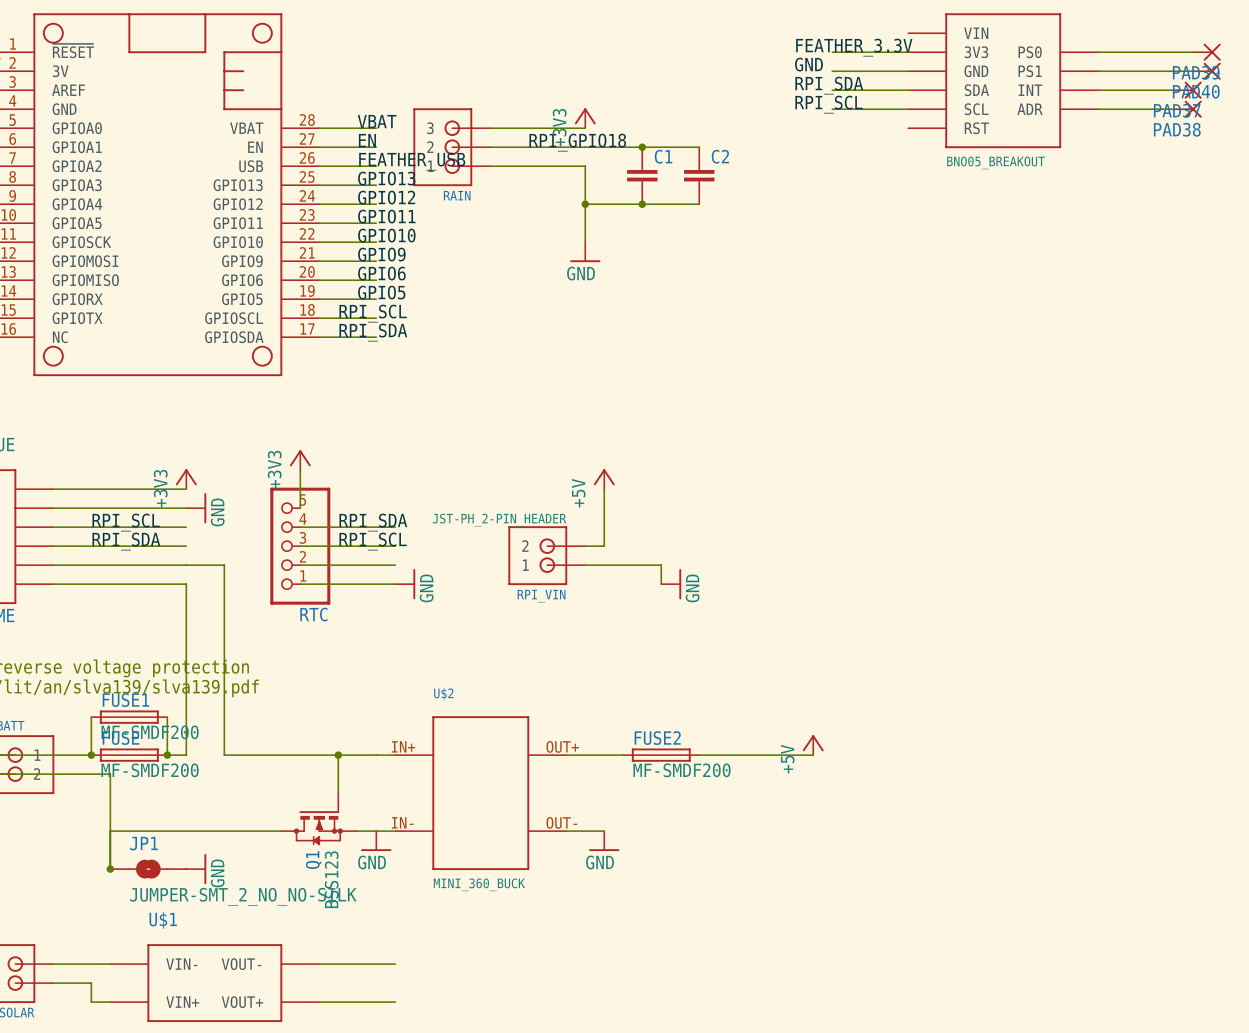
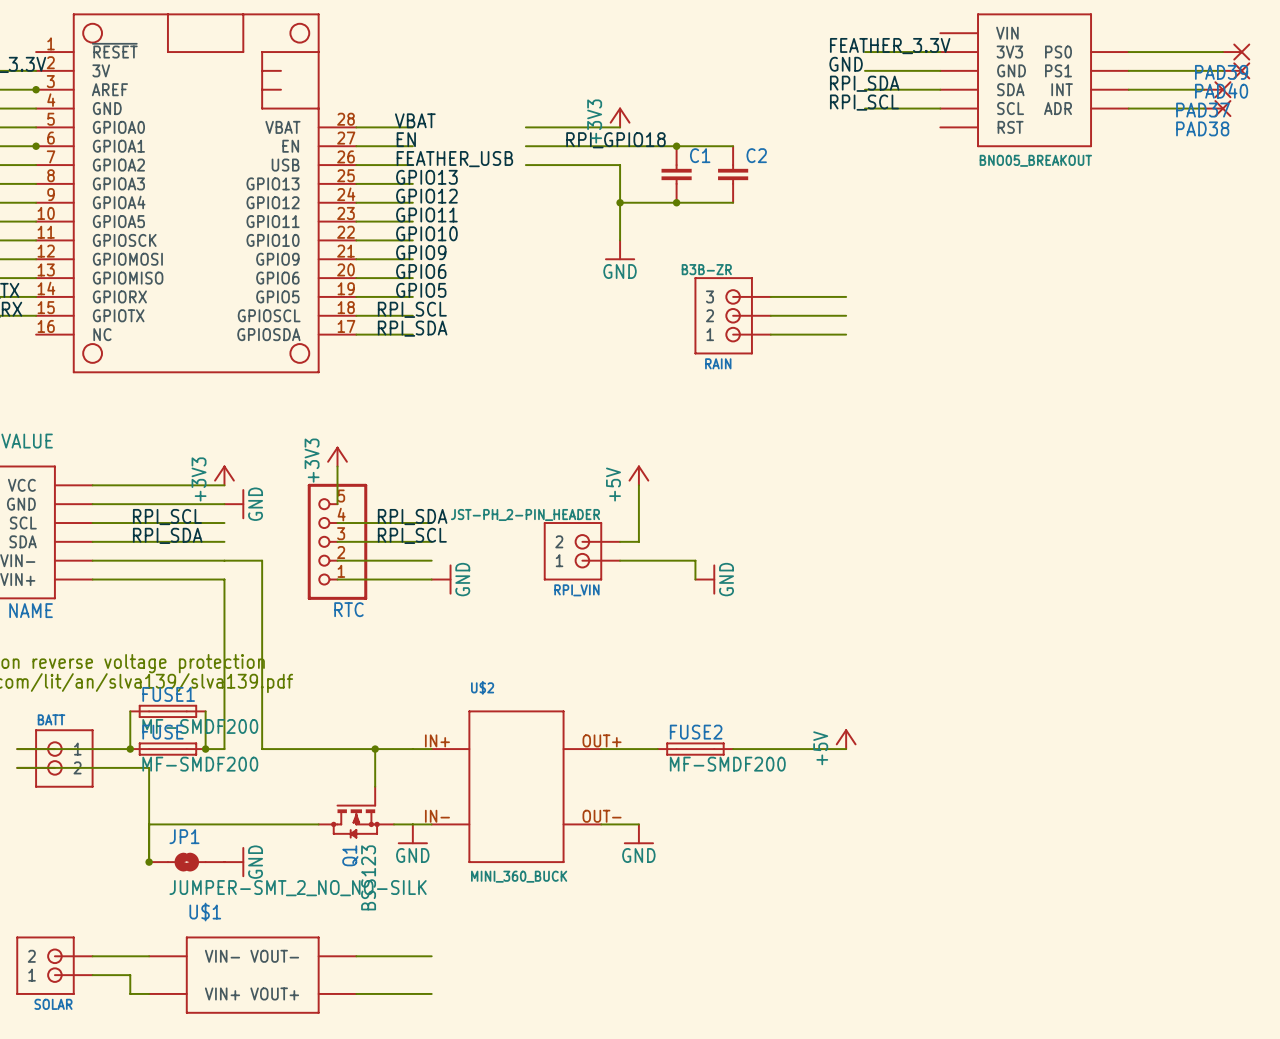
RAIN: (451, 147) -> none
wire: none -> (770, 296) (846, 296)
RAIN: none -> B3B-ZR (732, 315)
wire: none -> (770, 315) (846, 315)
wire: none -> (770, 334) (846, 334)

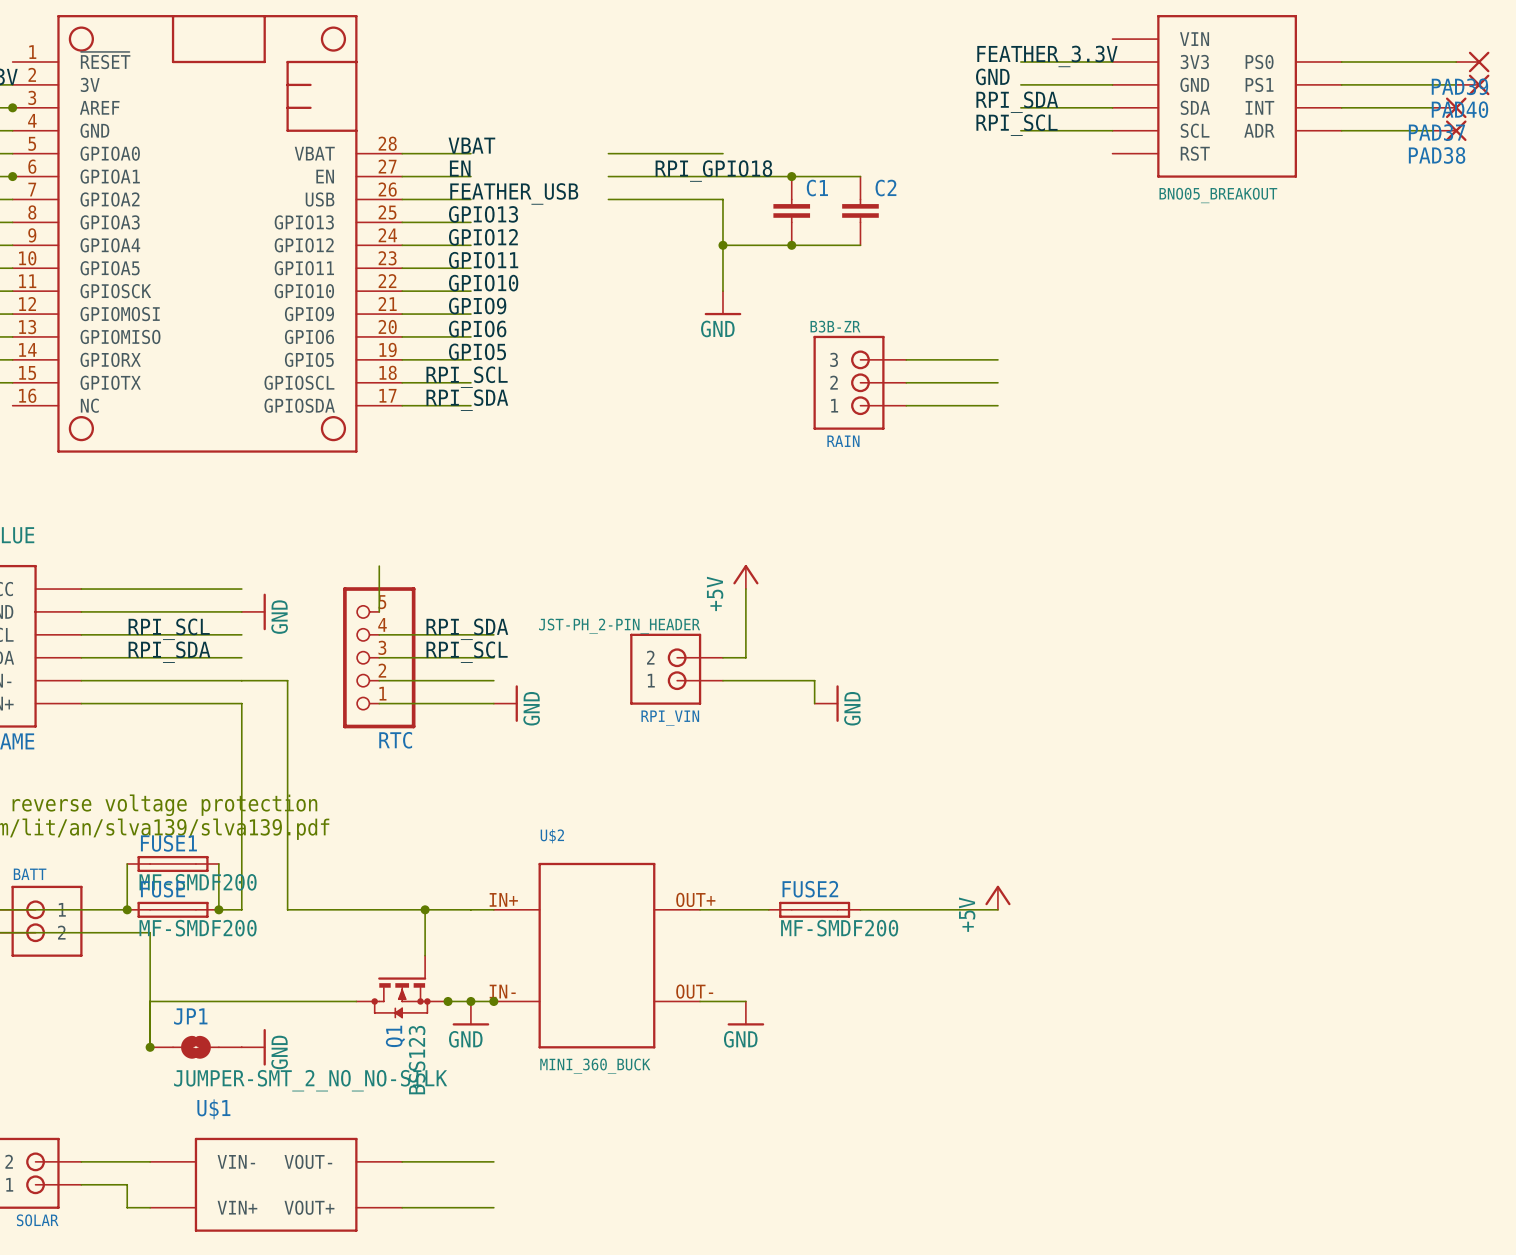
power symbol: +3V3 (620, 117) -> none
power symbol: +3V3 (337, 456) -> none
power symbol: +3V3 (224, 475) -> none
junction: none -> (448, 1001)
junction: none -> (470, 1001)
junction: none -> (493, 1001)

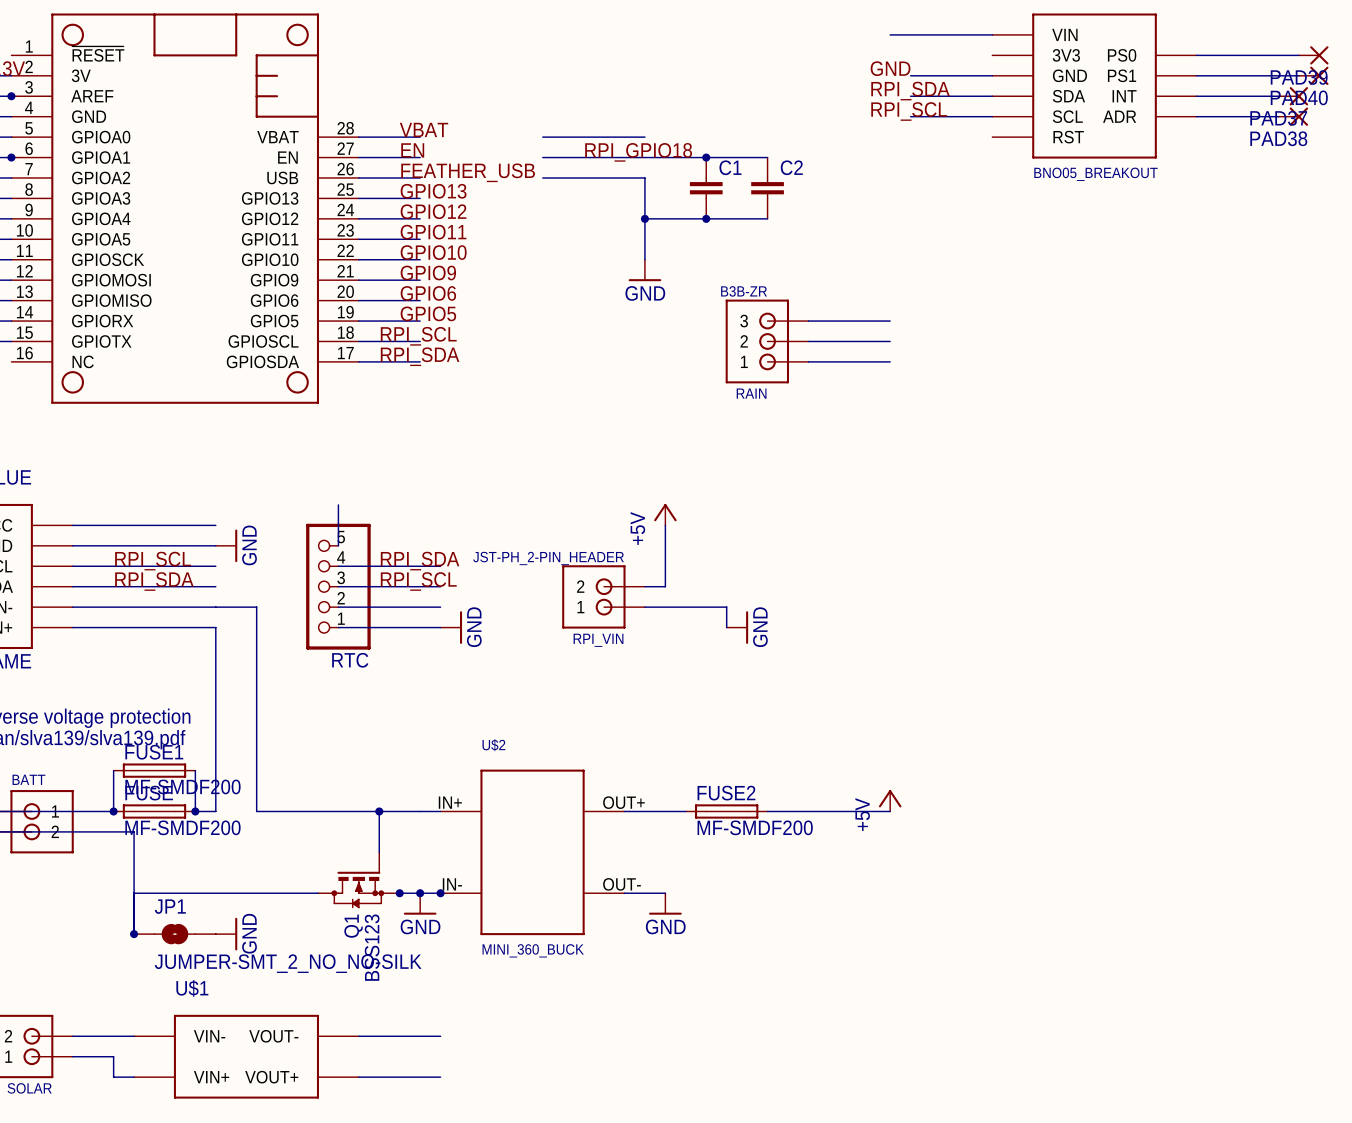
wire: none -> (890, 34) (992, 34)
label: FEATHER_3.3V (1047, 56) -> none
wire: (1020, 61) (1112, 61) -> none

